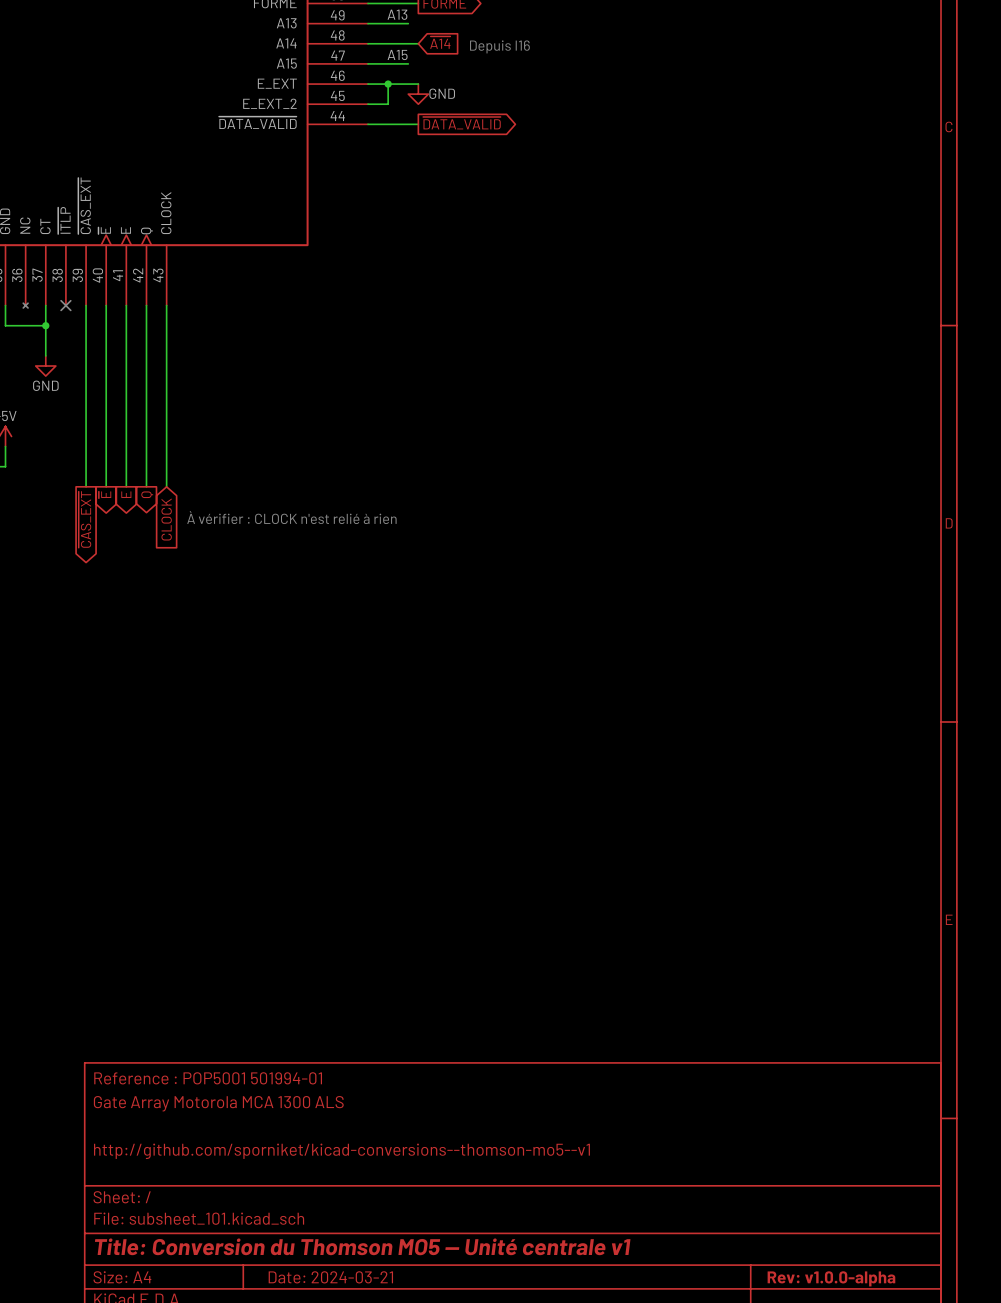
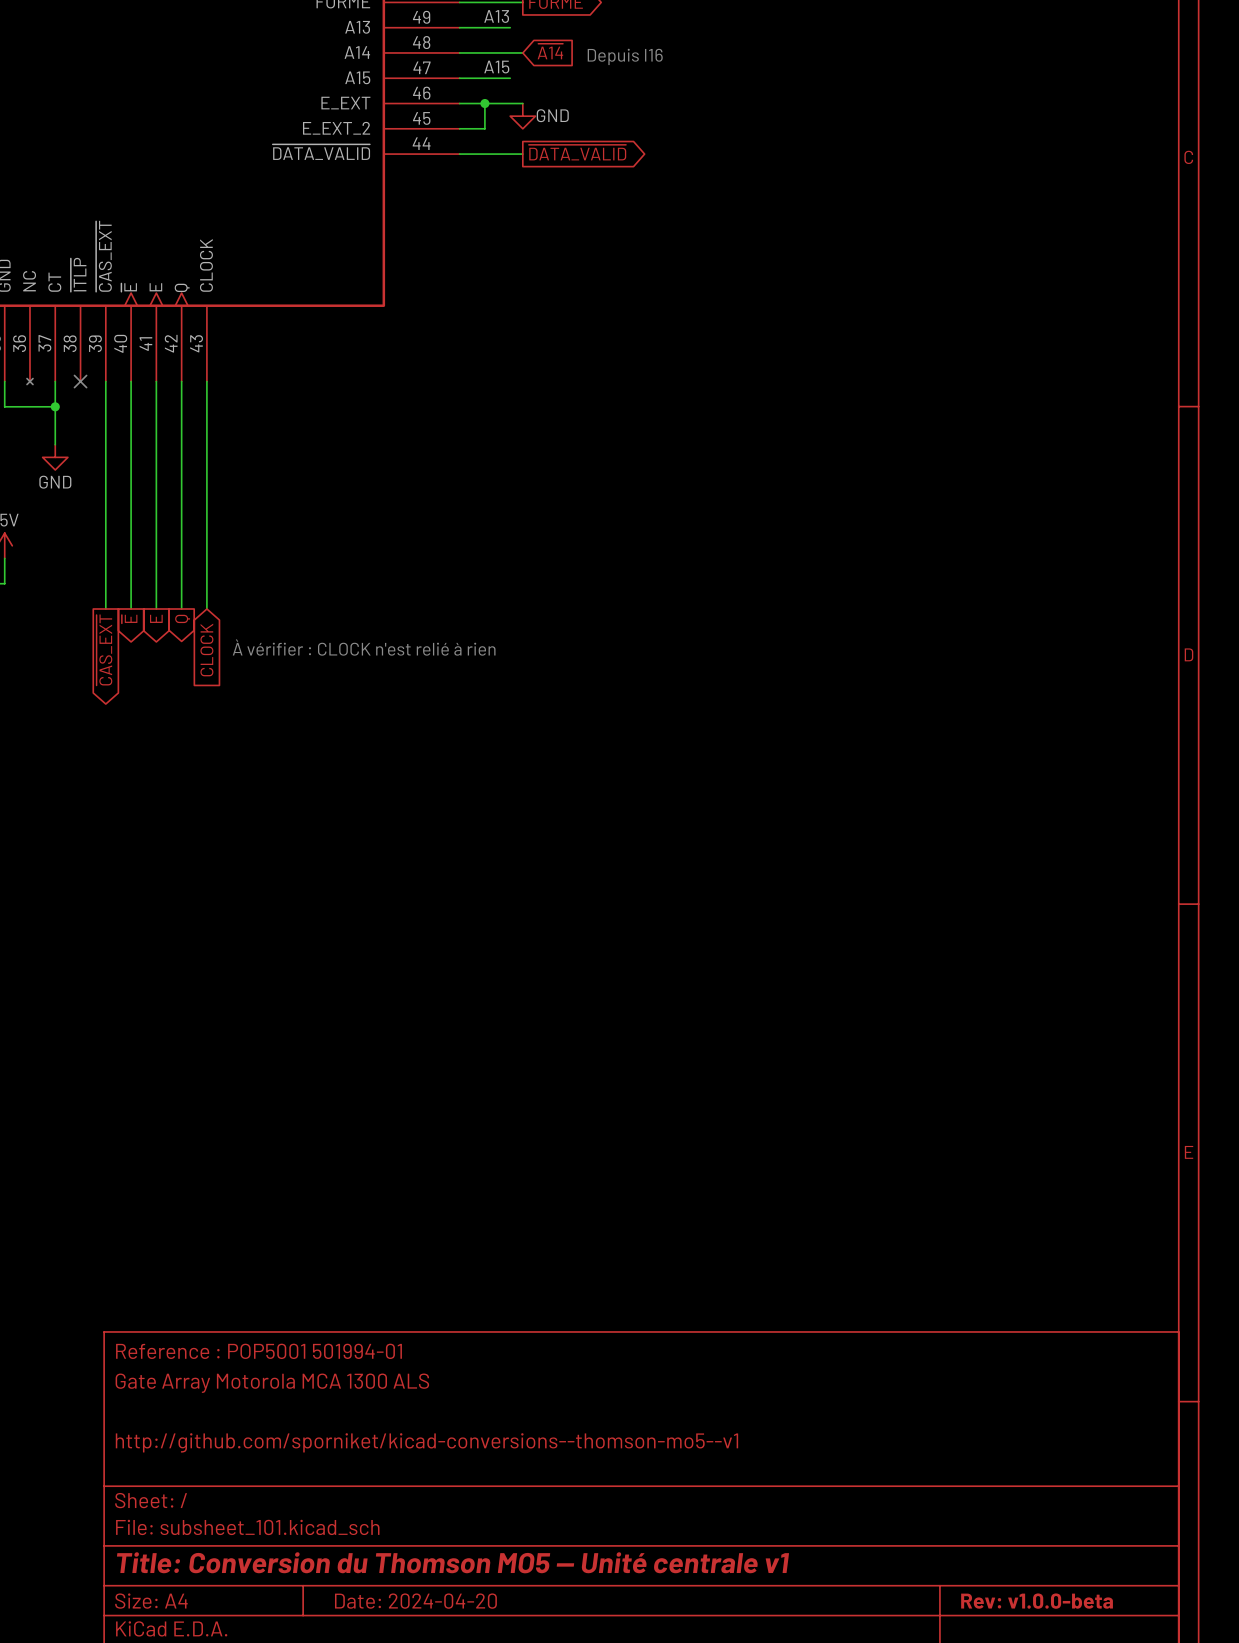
title block: Date: 2024-03-21 (330, 1277) -> Date: 2024-04-20 (415, 1601)
title block: Rev: v1.0.0-alpha (831, 1278) -> Rev: v1.0.0-beta (1037, 1601)

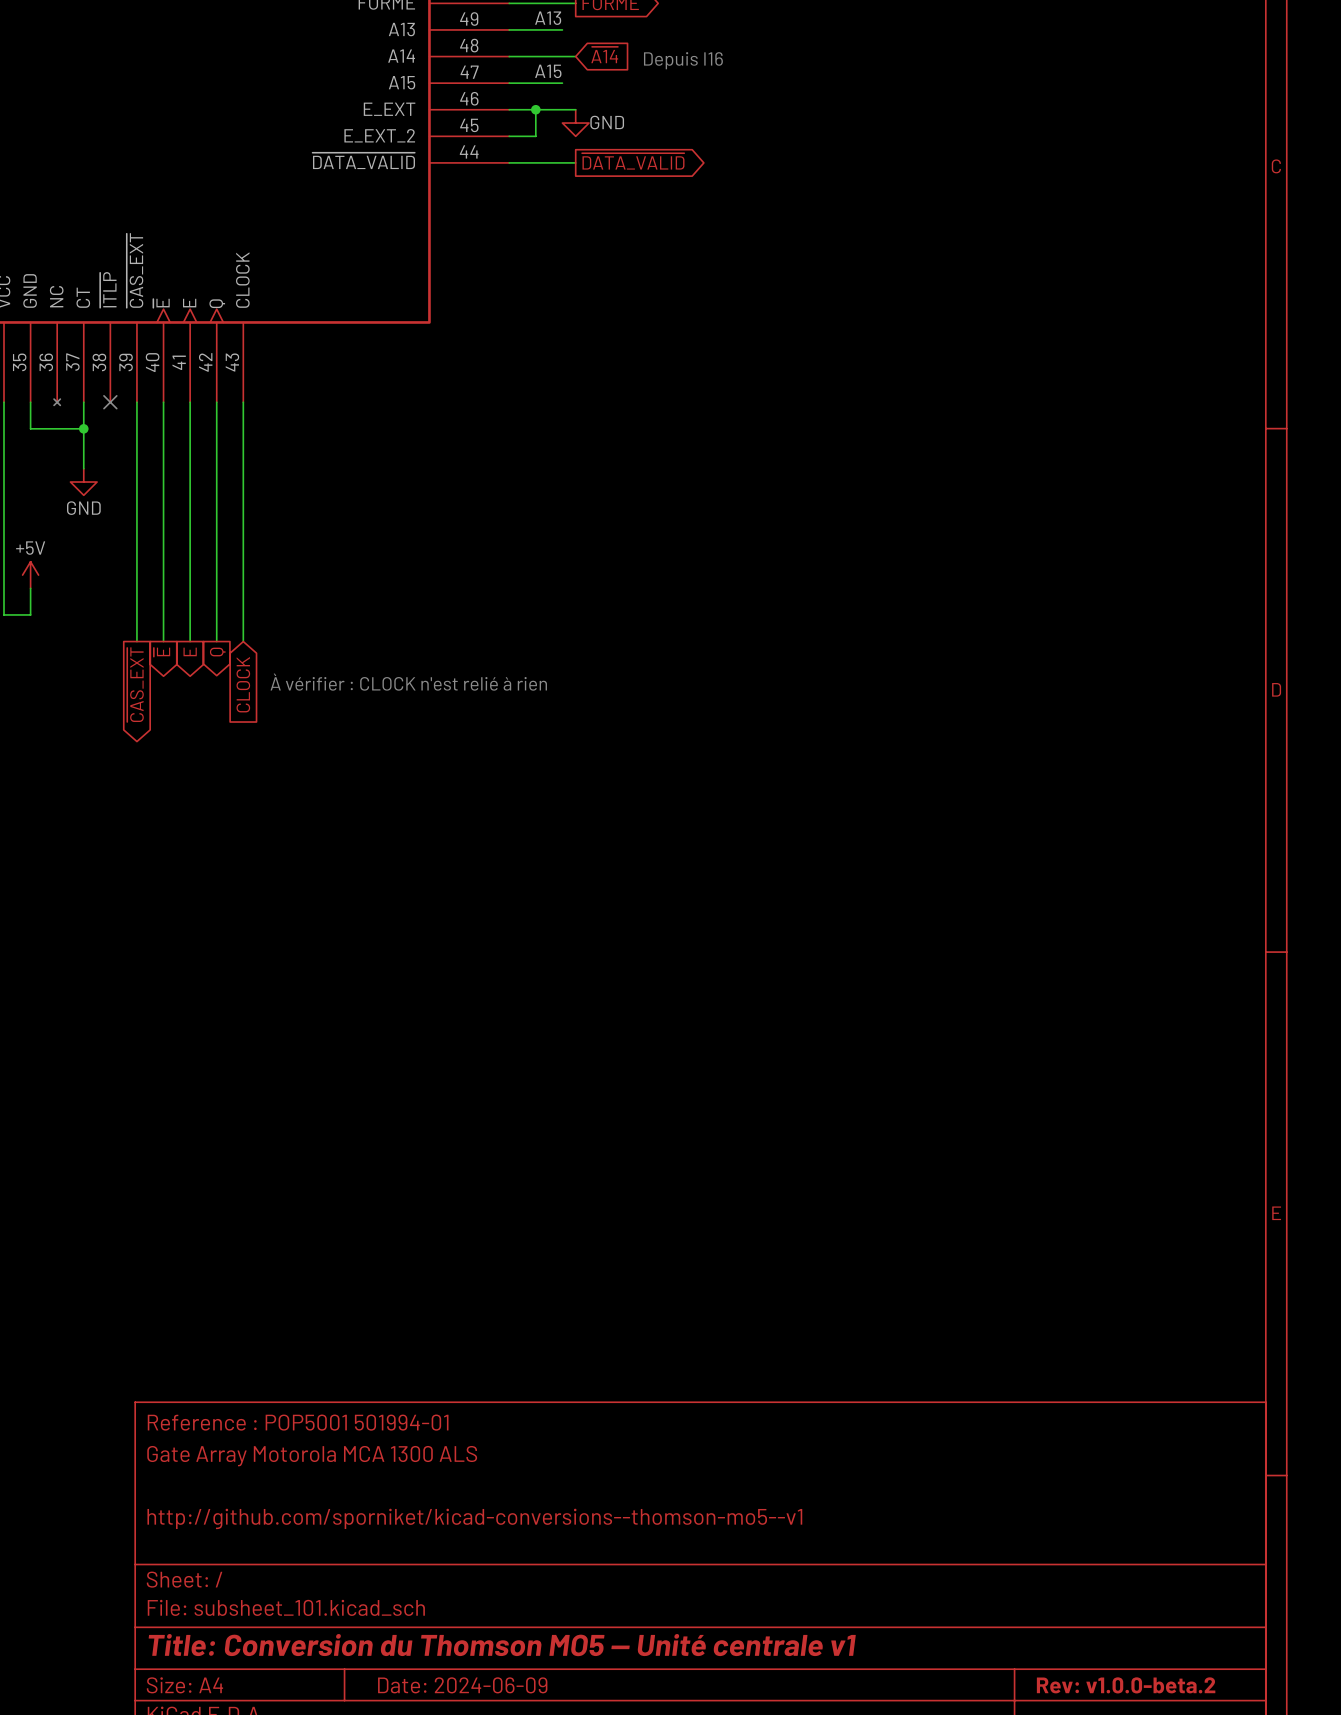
title block: Date: 2024-04-20 (415, 1601) -> Date: 2024-06-09 (462, 1685)
title block: Rev: v1.0.0-beta (1037, 1601) -> Rev: v1.0.0-beta.2 (1126, 1685)

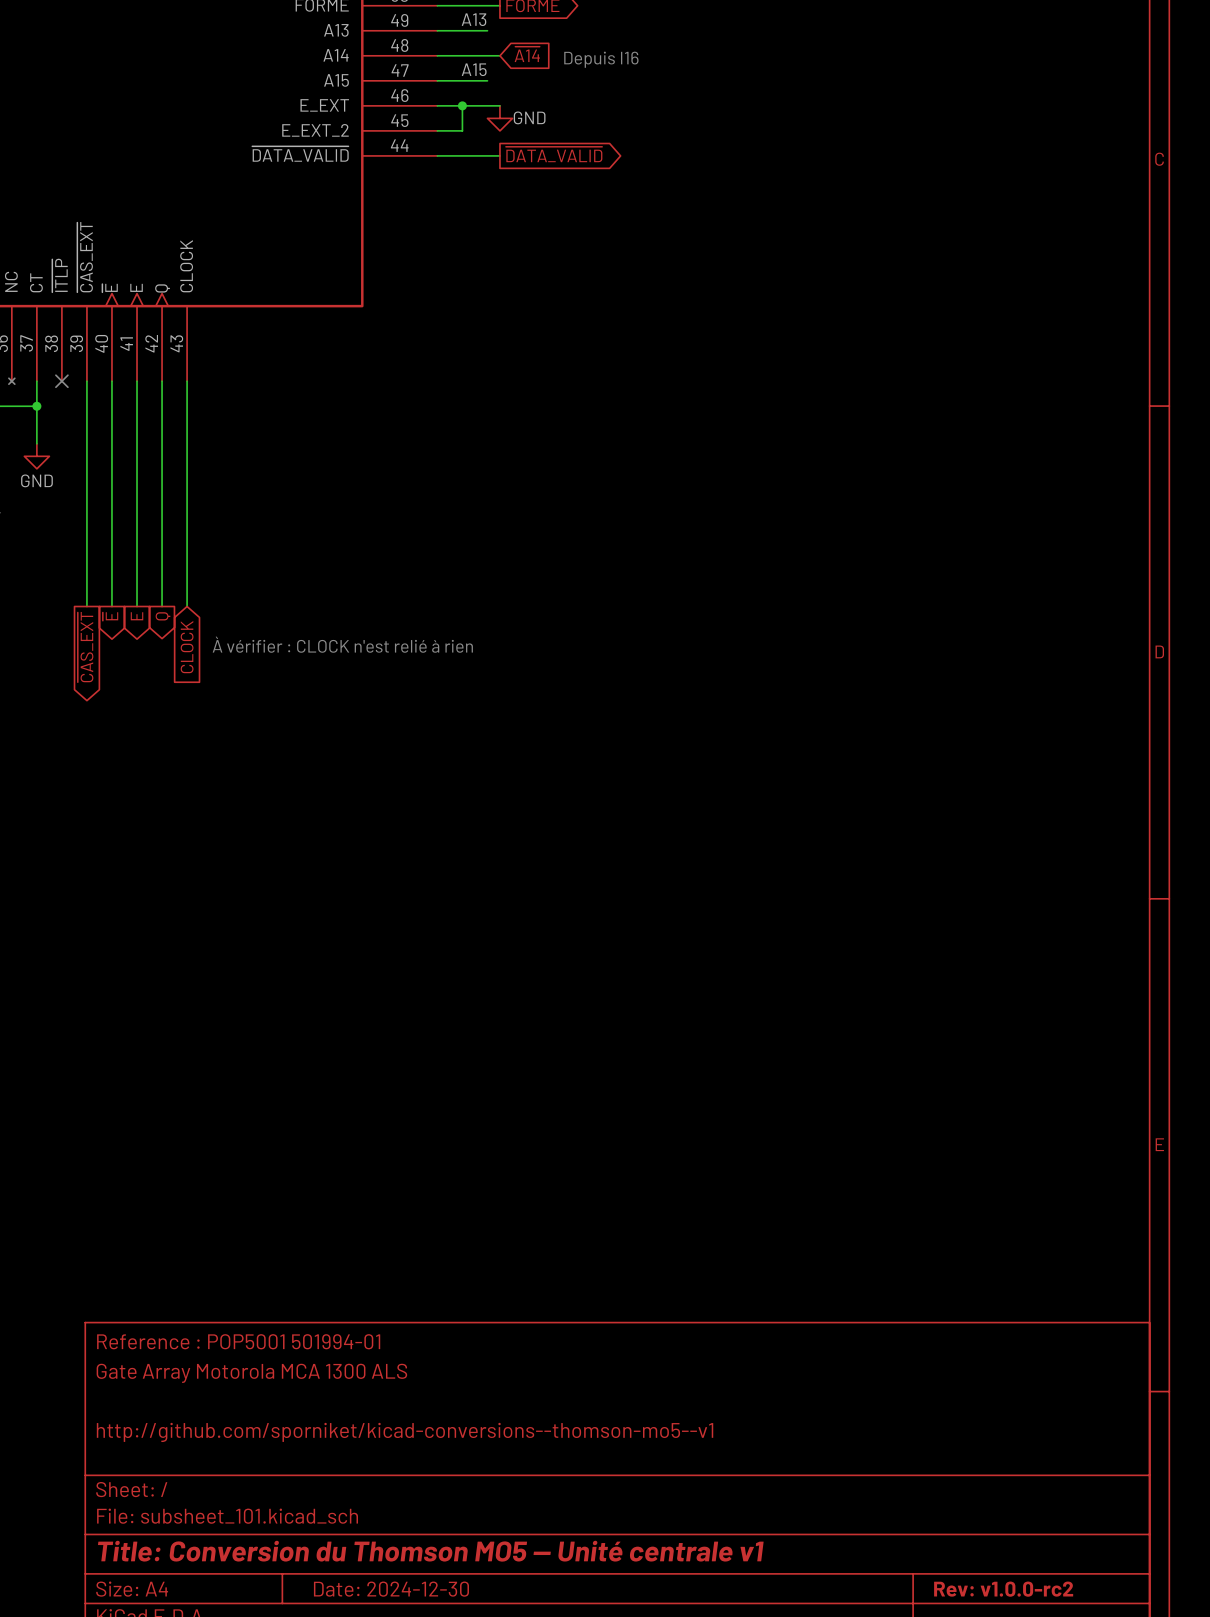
title block: Date: 2024-06-09 (462, 1685) -> Date: 2024-12-30 (391, 1589)
title block: Rev: v1.0.0-beta.2 (1126, 1685) -> Rev: v1.0.0-rc2 (1003, 1589)

